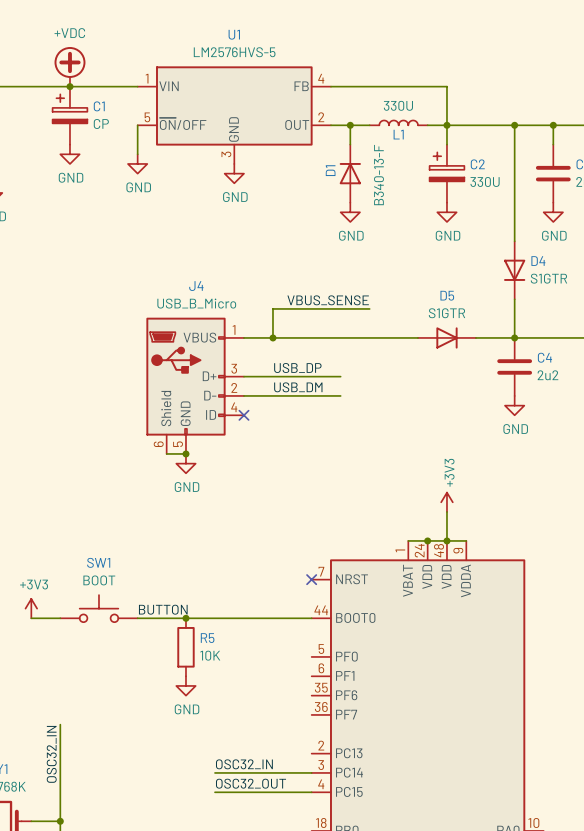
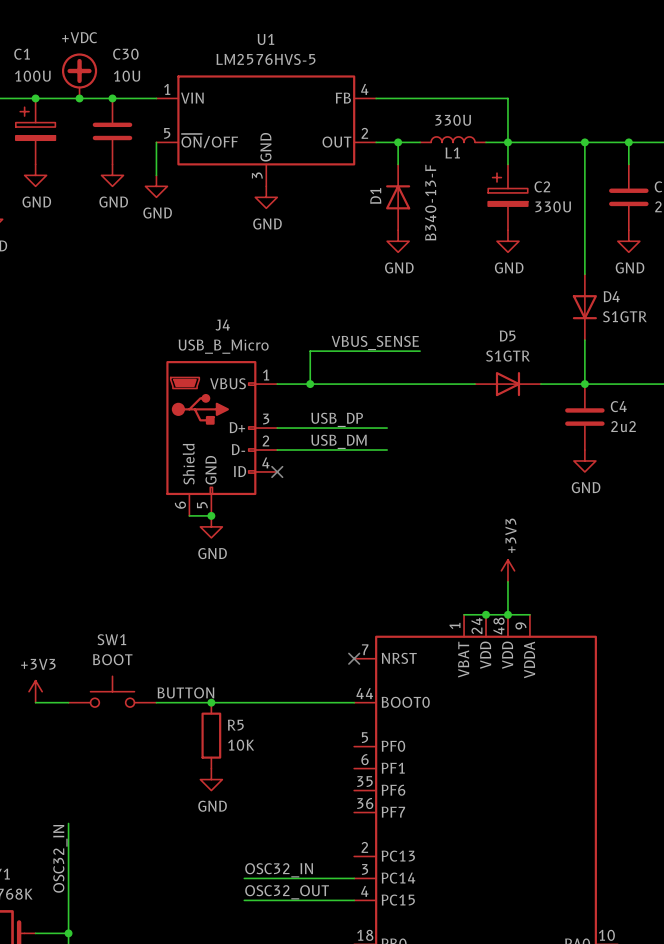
junction: none -> (35, 98)
junction: none -> (112, 98)
C1 name position: C1 (99, 106) -> C1 (22, 54)
C1 position: (69, 115) -> (35, 131)
C30: none -> 10U (112, 131)
C1 value: CP (101, 123) -> 100U (32, 76)
power symbol: none -> GND (35, 175)
power symbol: GND (69, 154) -> none
power symbol: none -> GND (112, 175)

